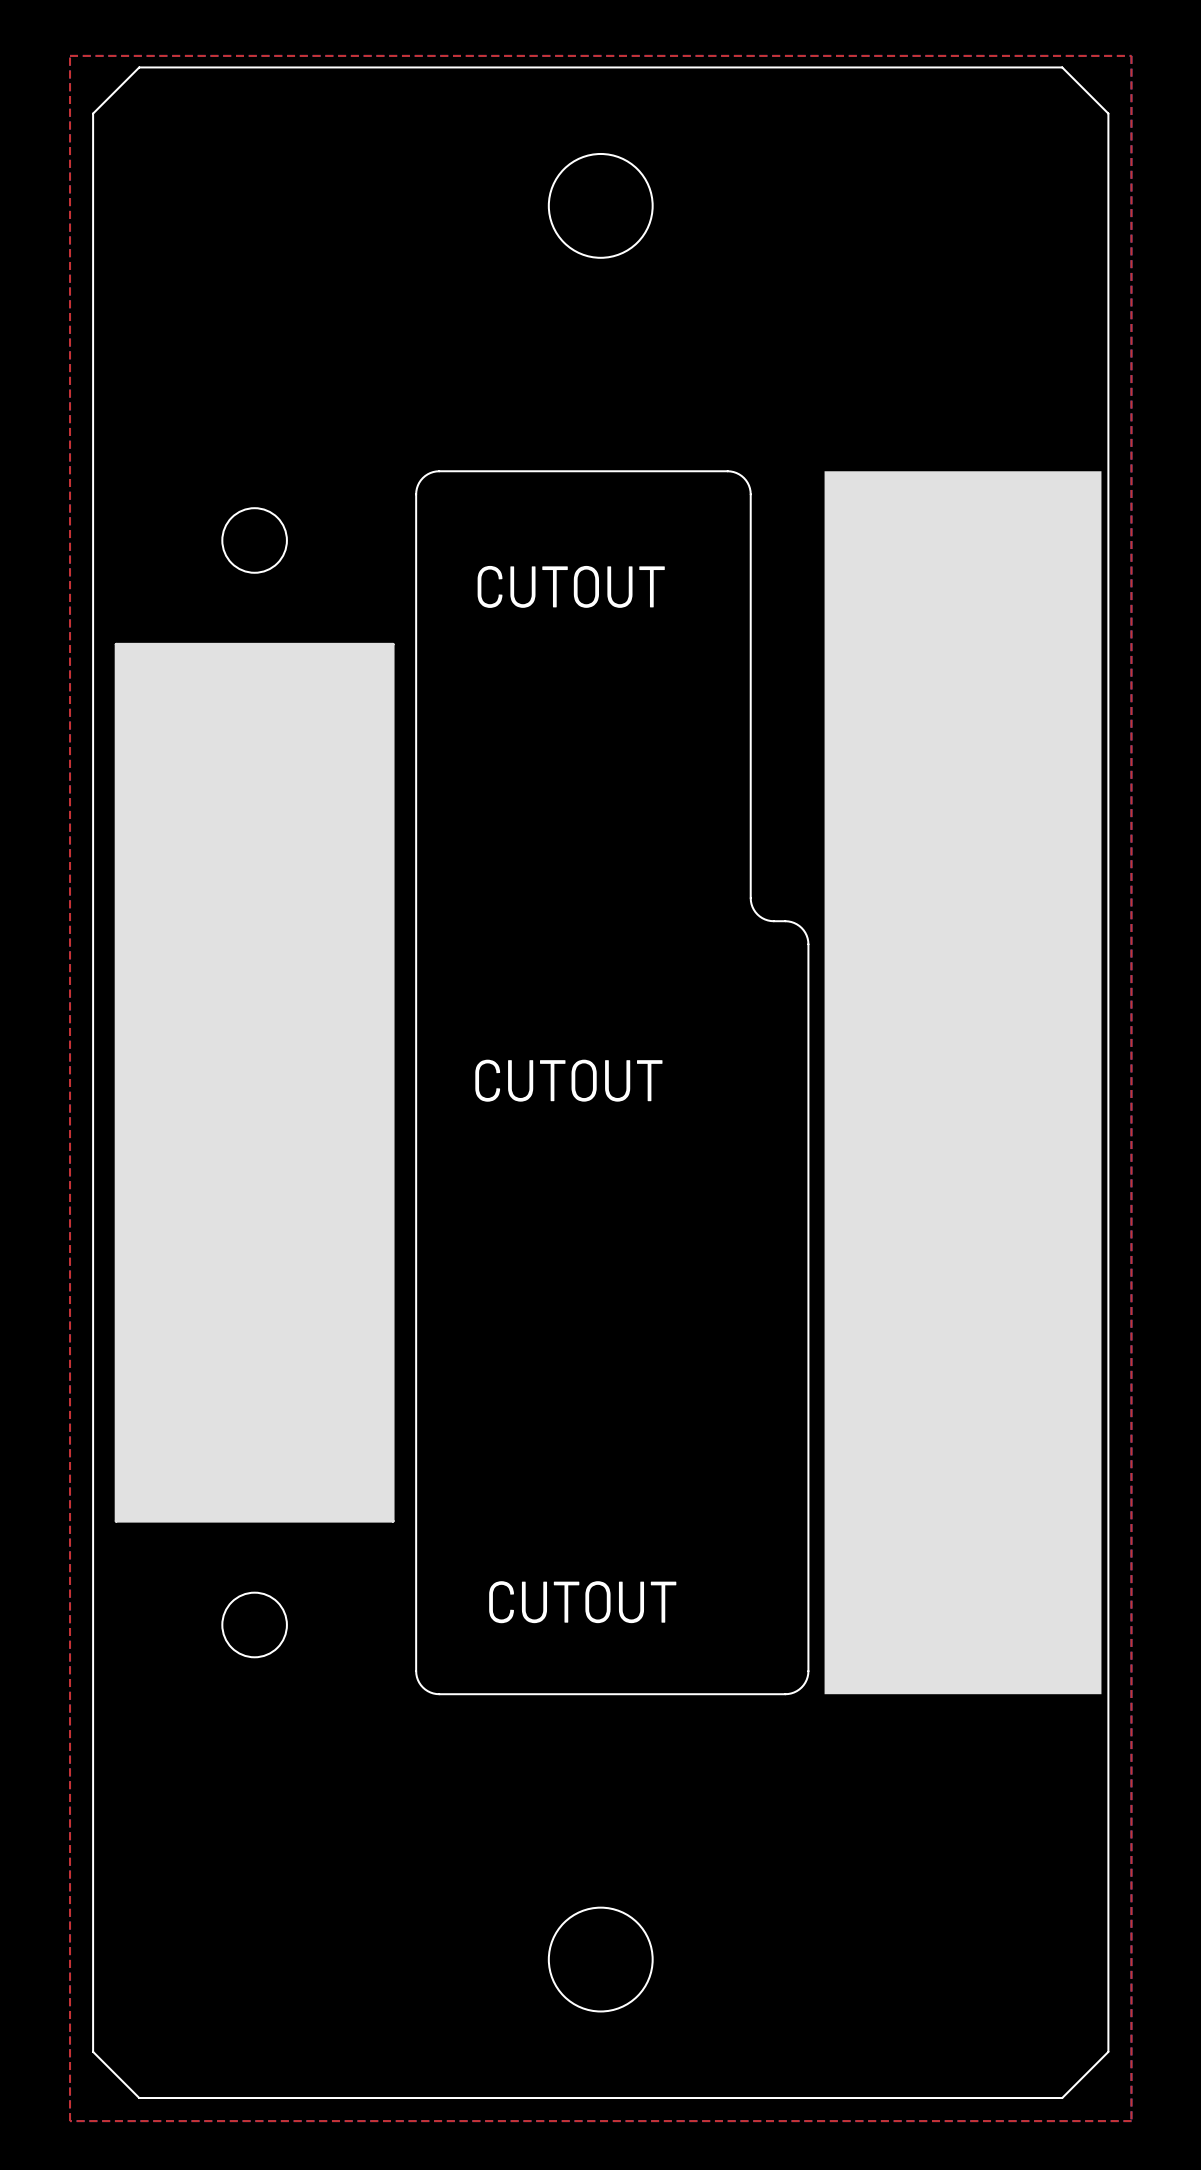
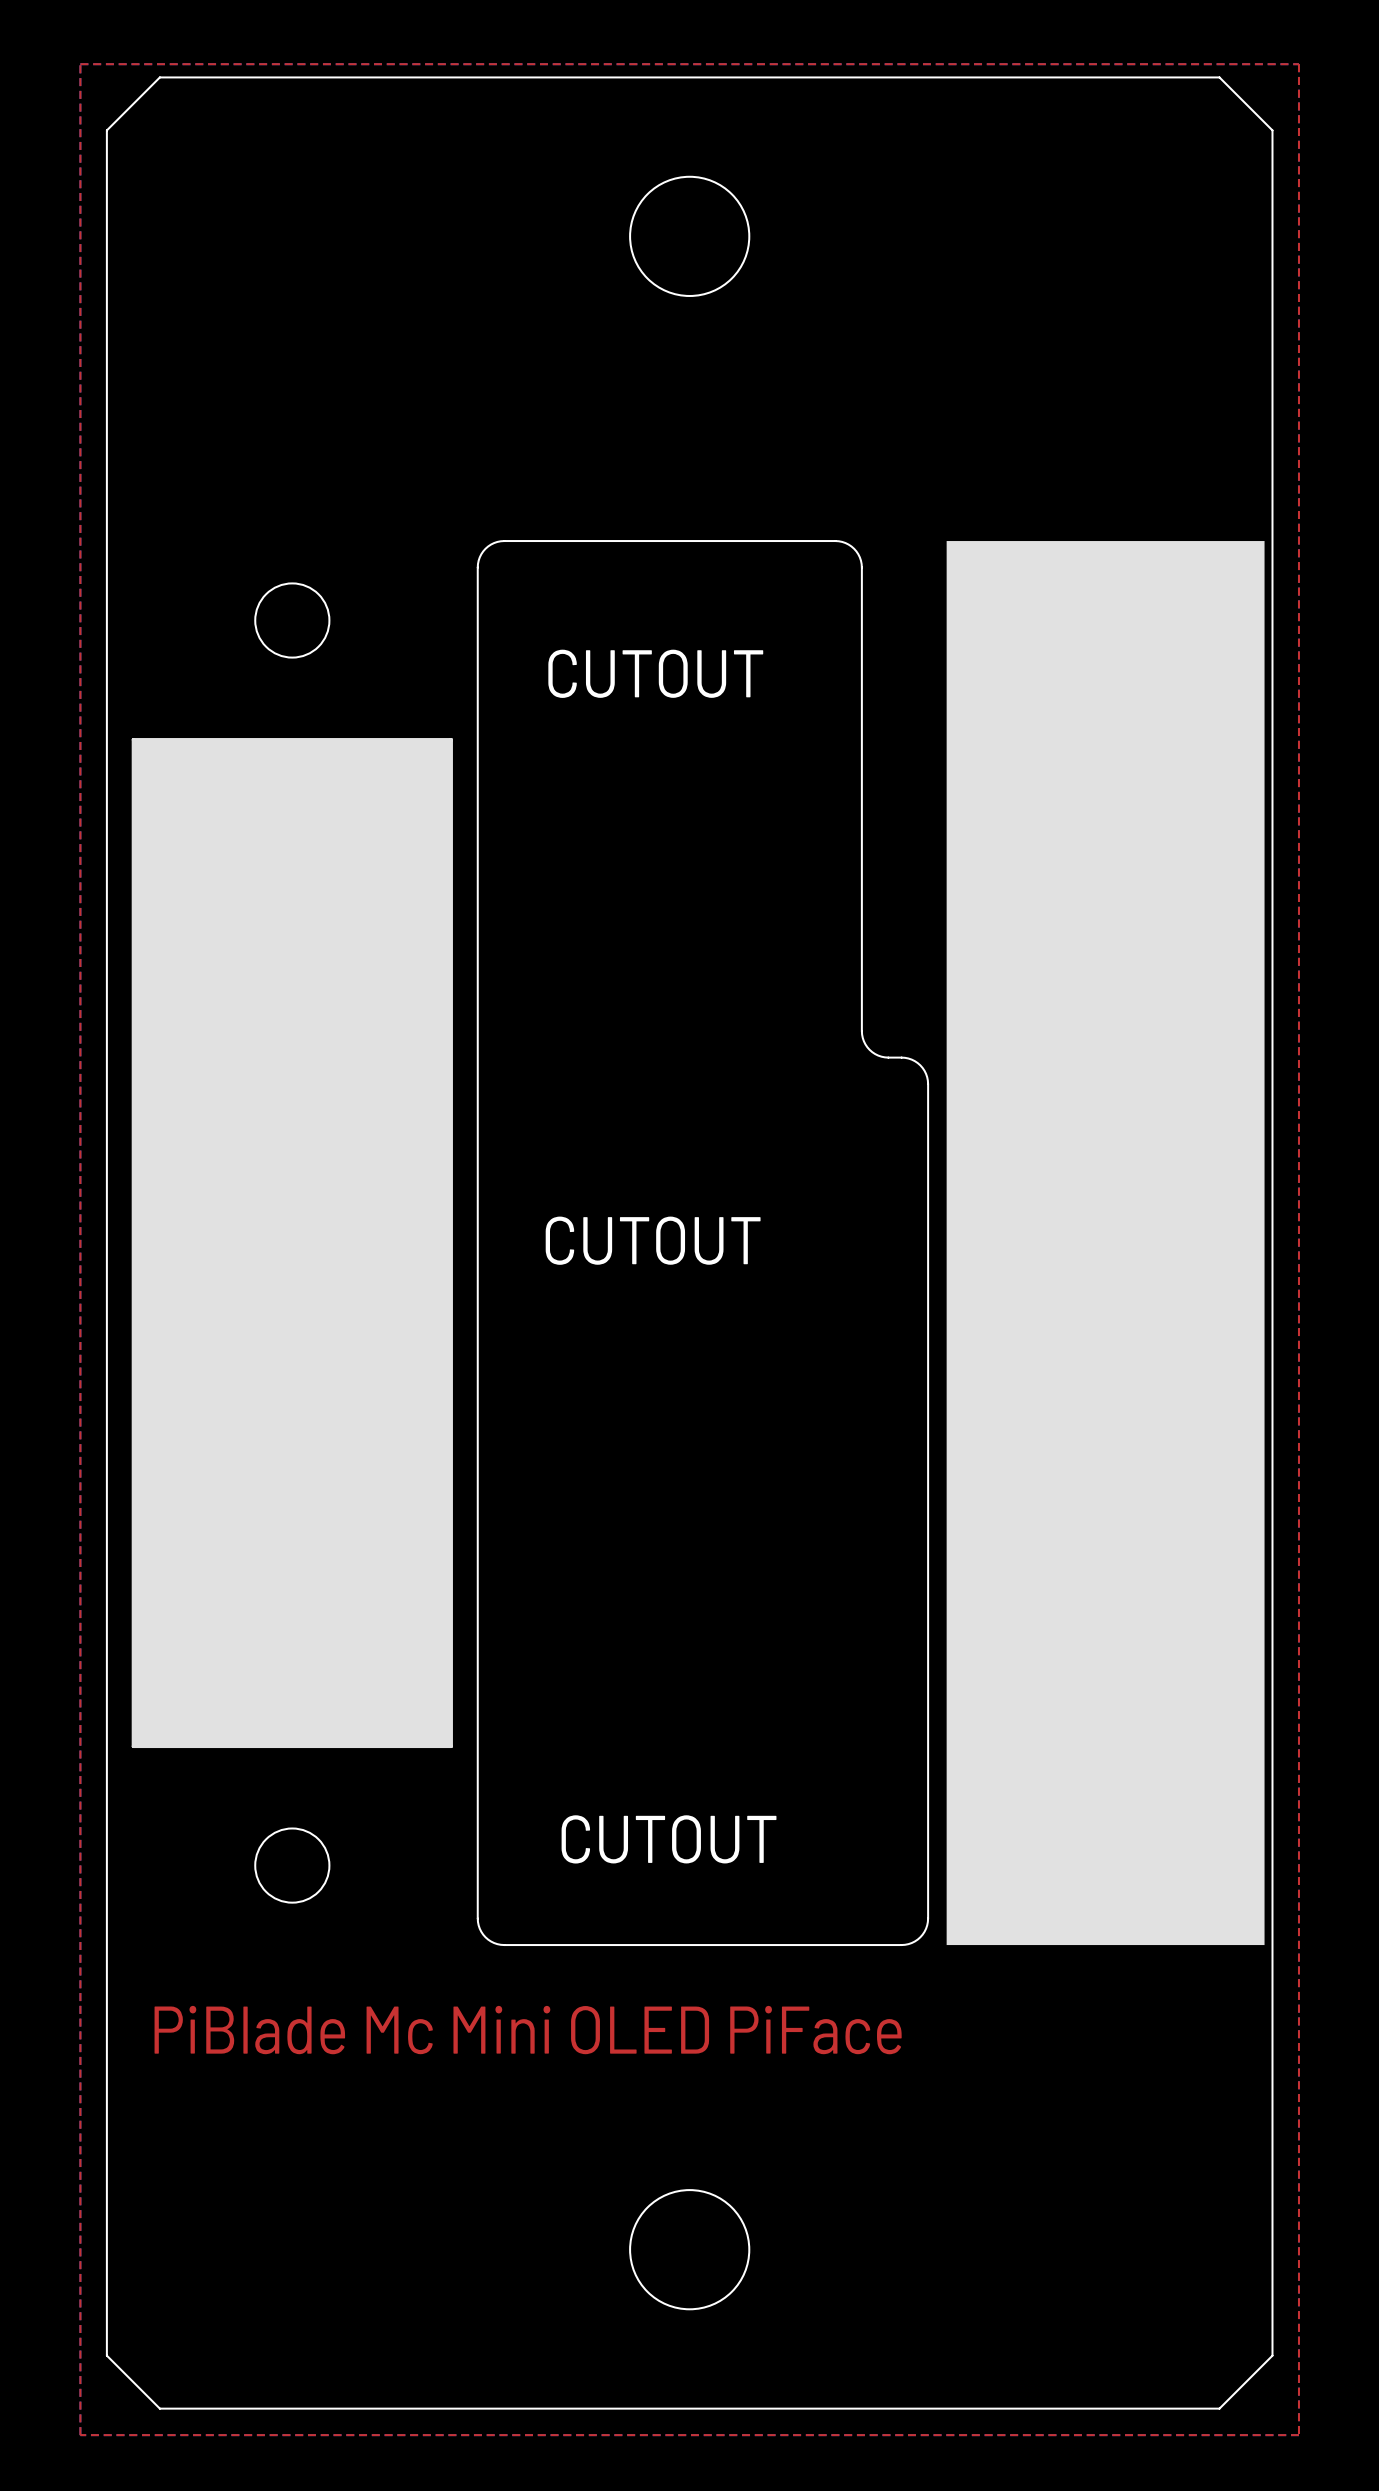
text: none -> PiBlade Mc Mini OLED PiFace (528, 2030)

